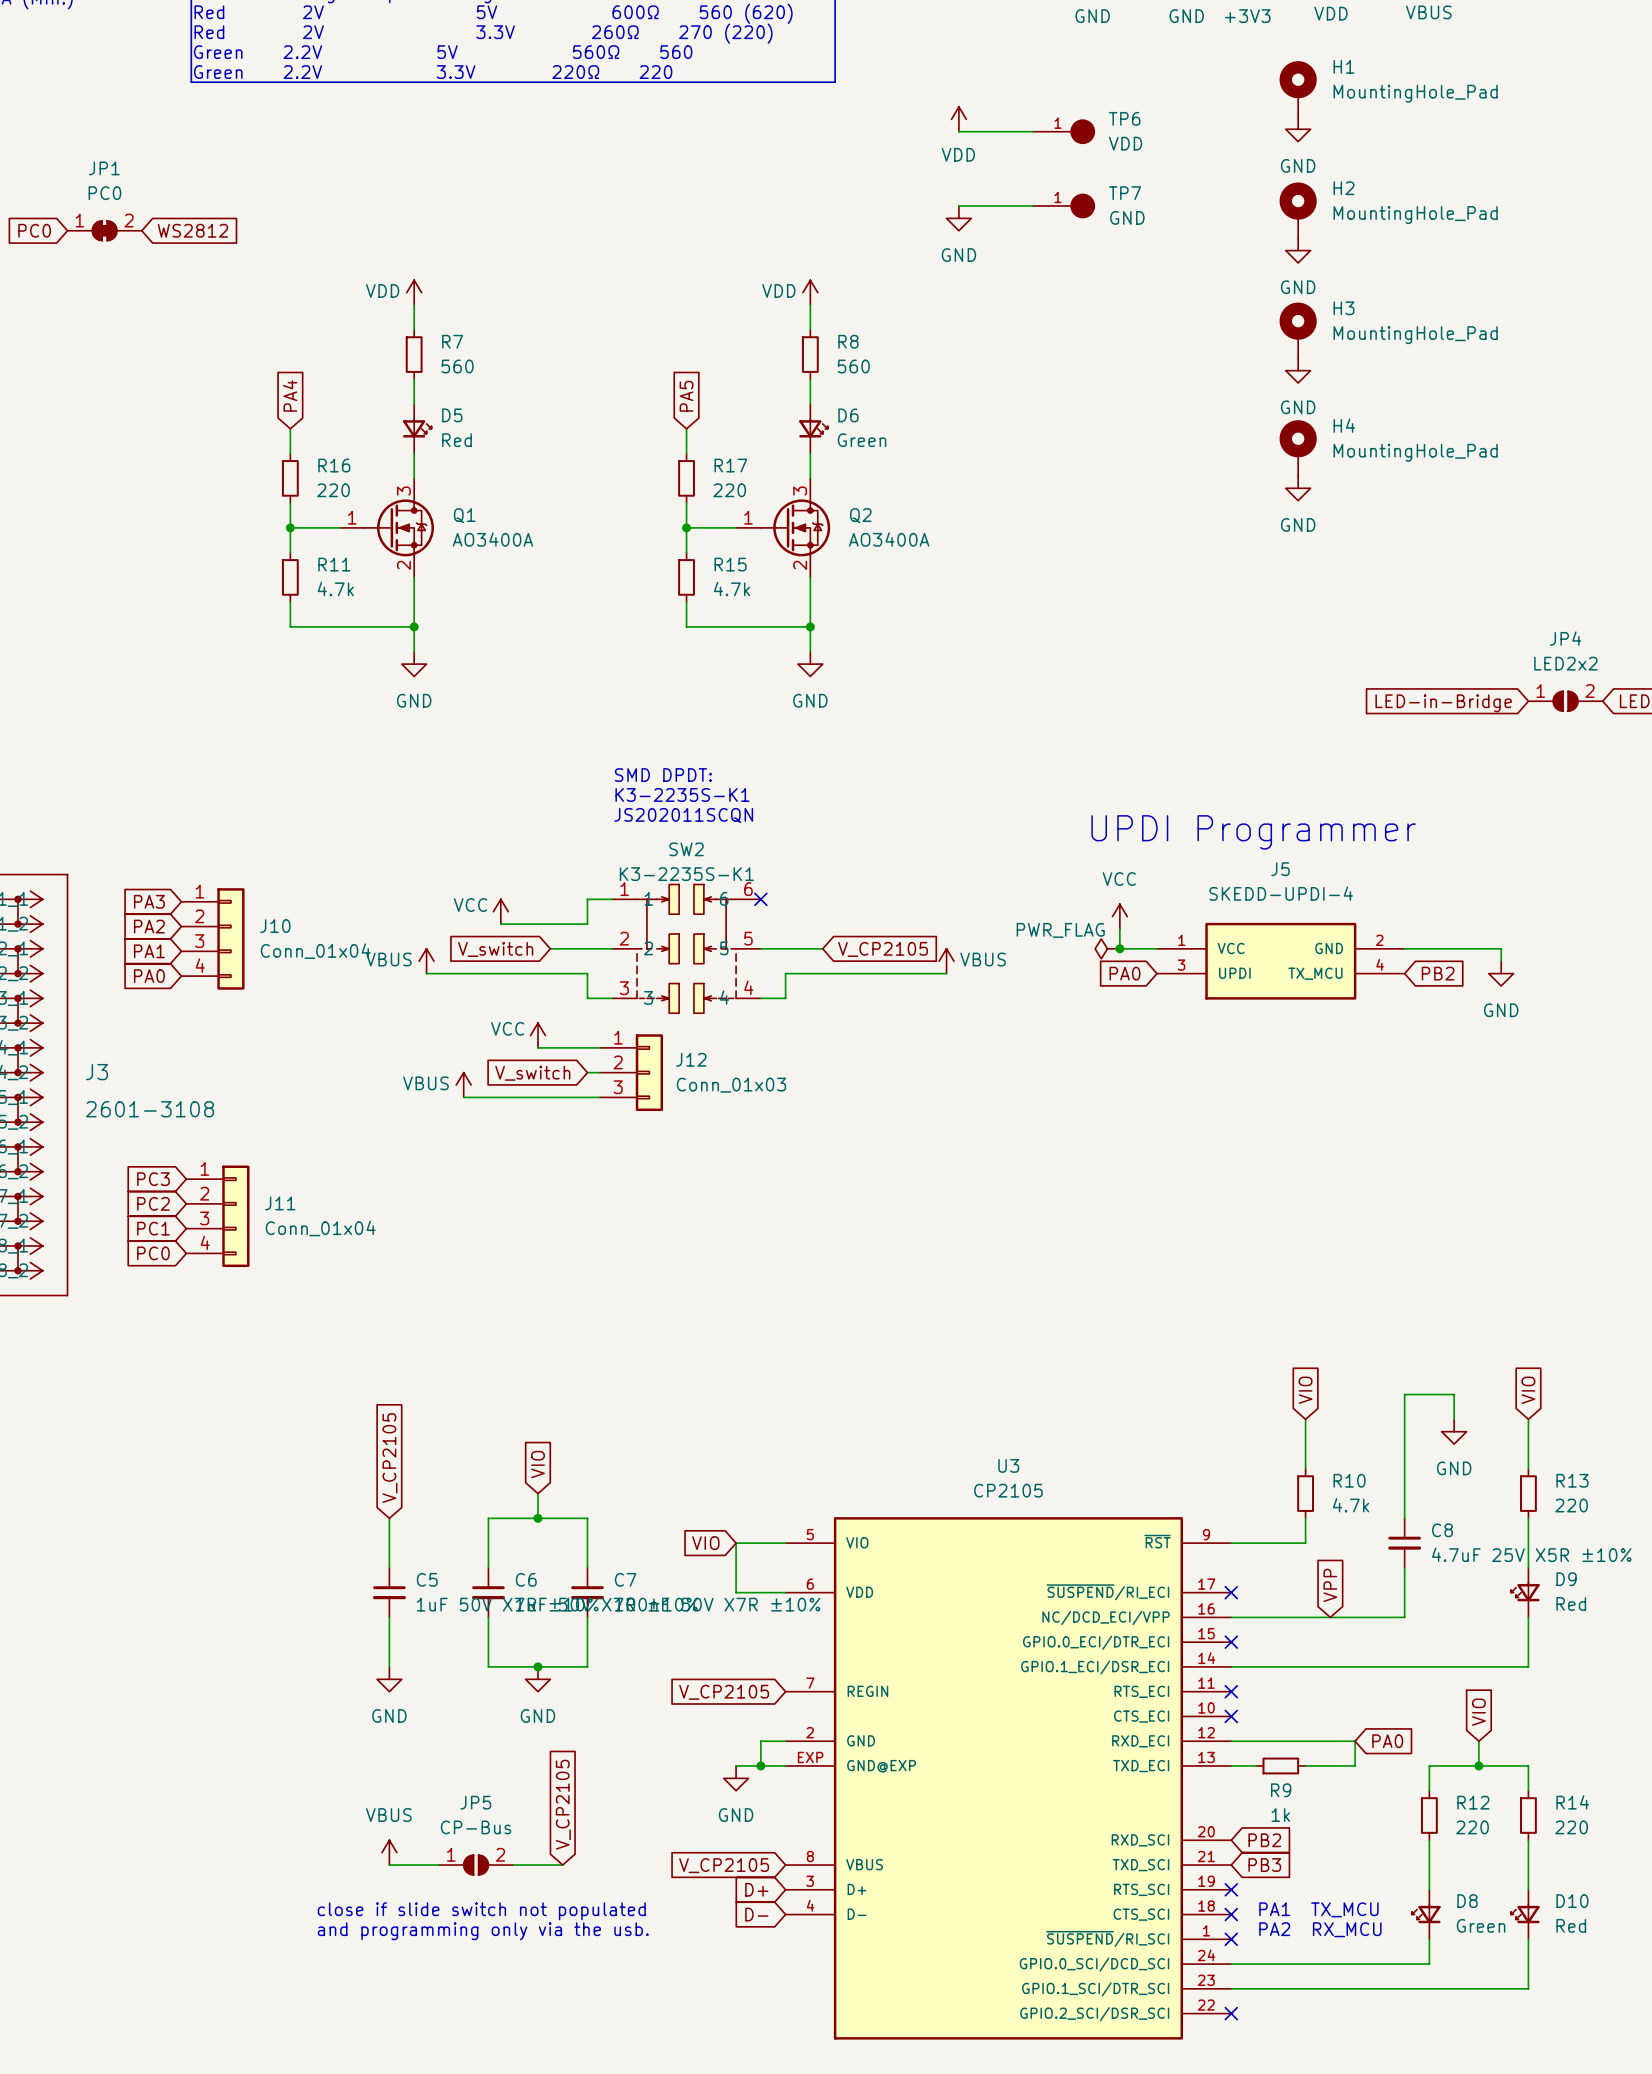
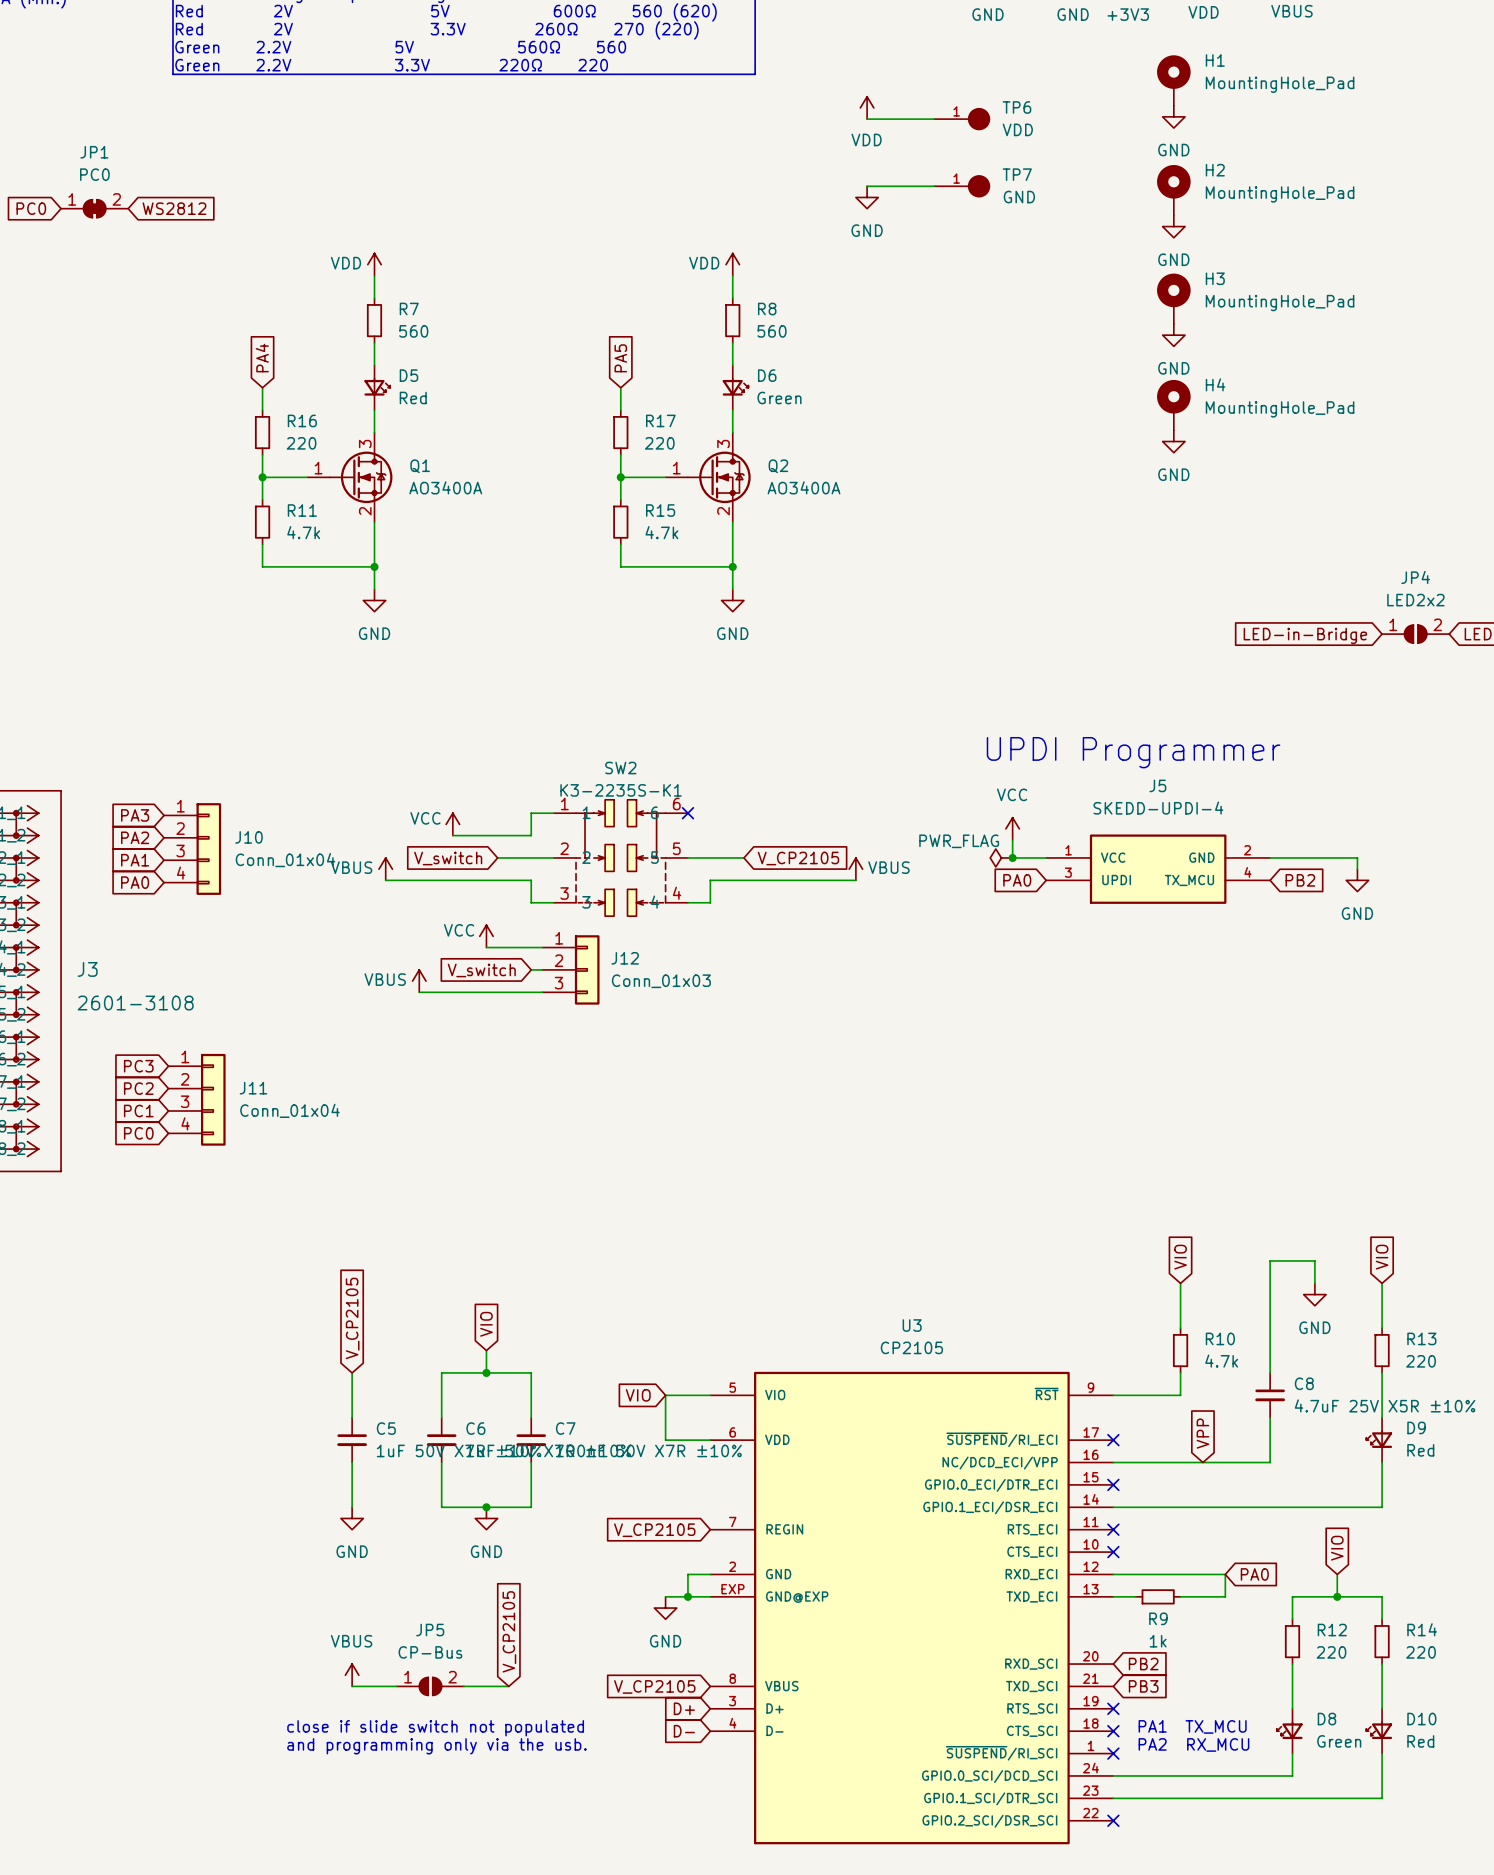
text: SMD DPDT: (663, 775) -> none
text: K3-2235S-K1 (682, 794) -> none
text: JS202011SCQN (683, 815) -> none

